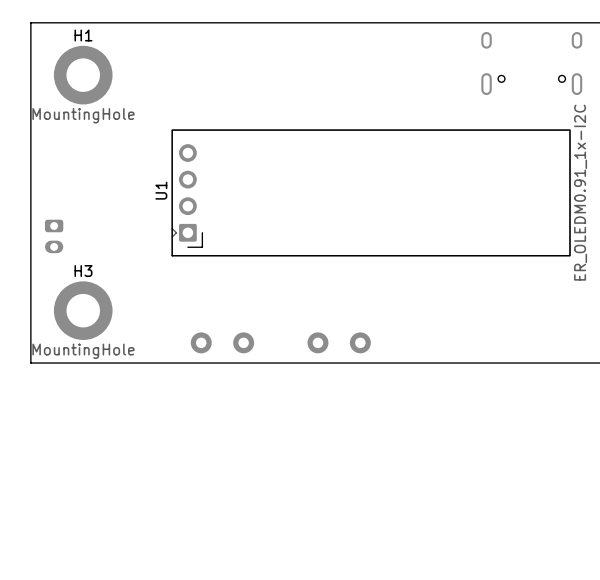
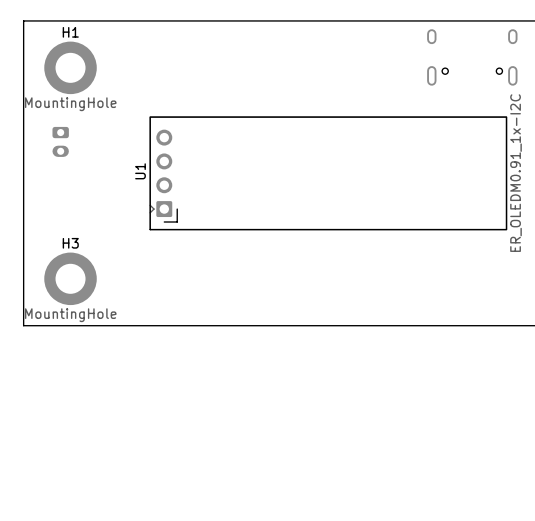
part position: (54, 236) -> (60, 141)
part: (201, 342) -> none
part: (243, 342) -> none
part: (317, 342) -> none
part: (360, 342) -> none

